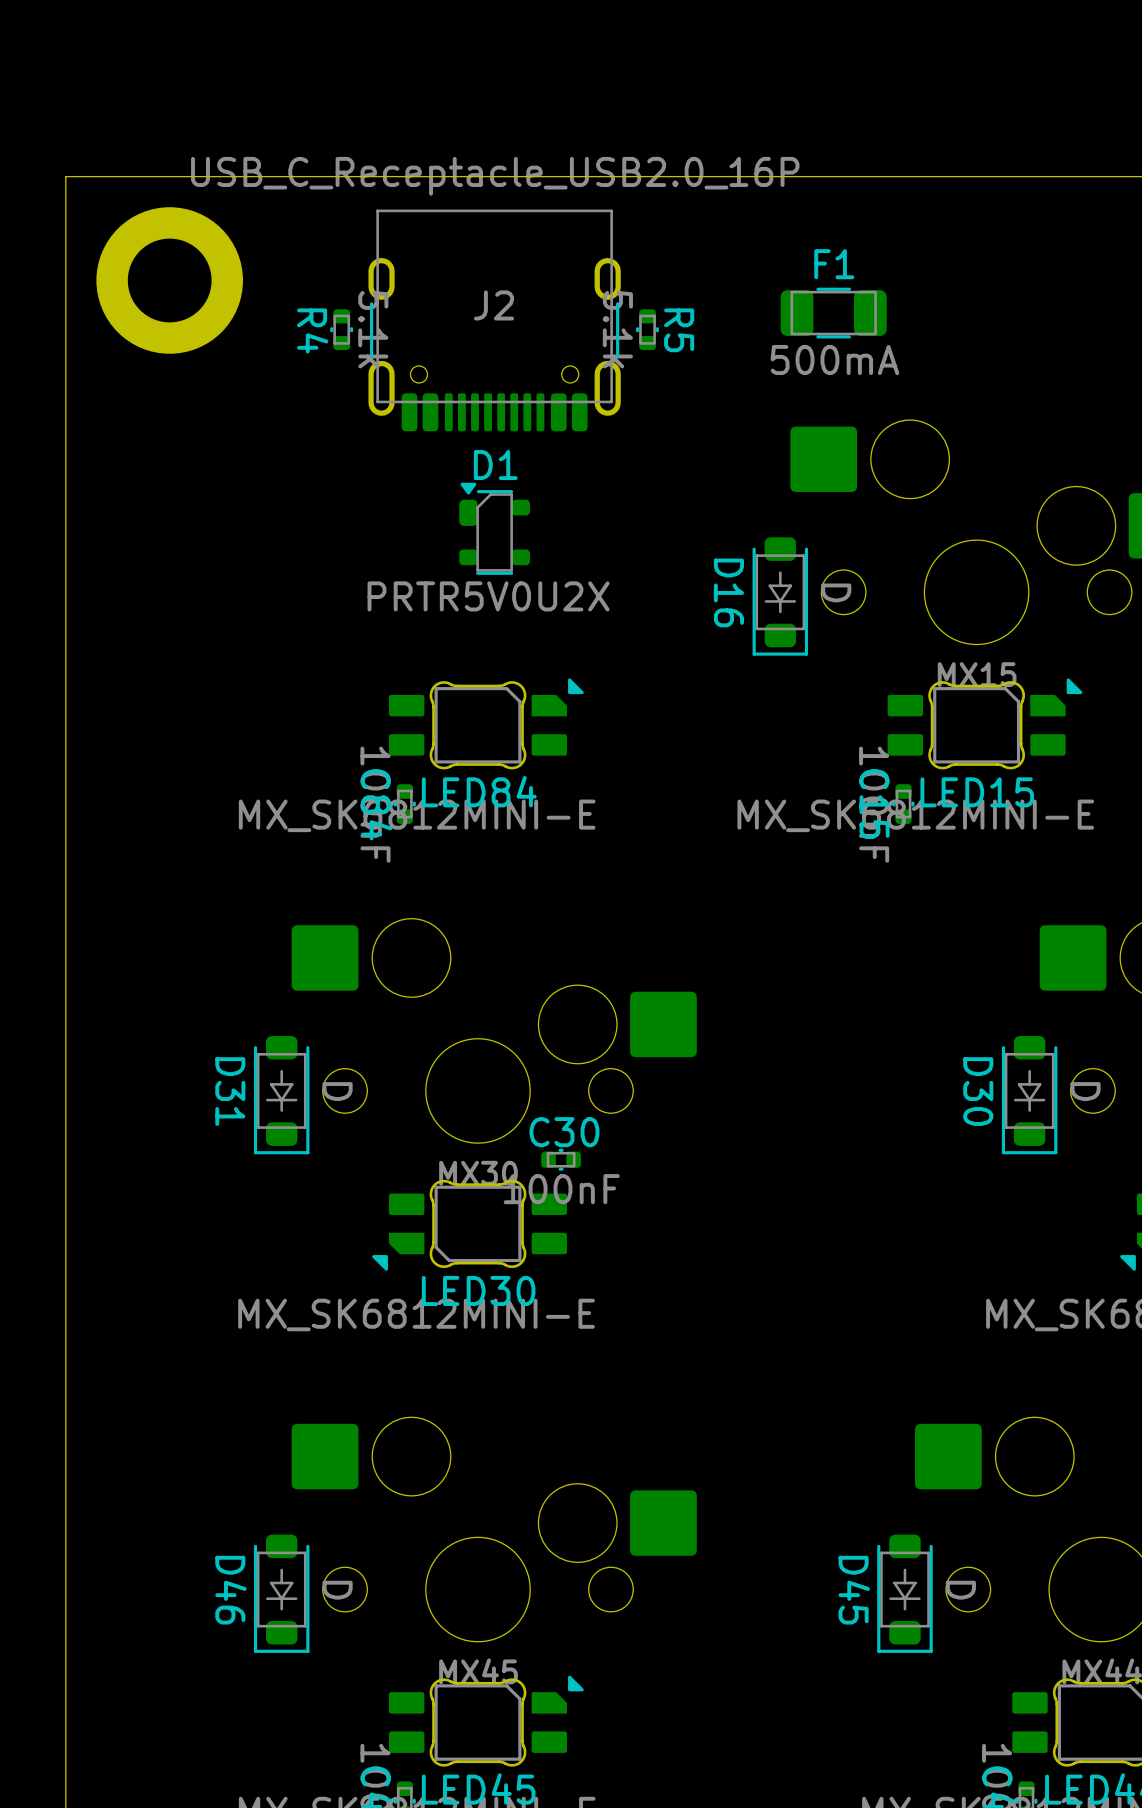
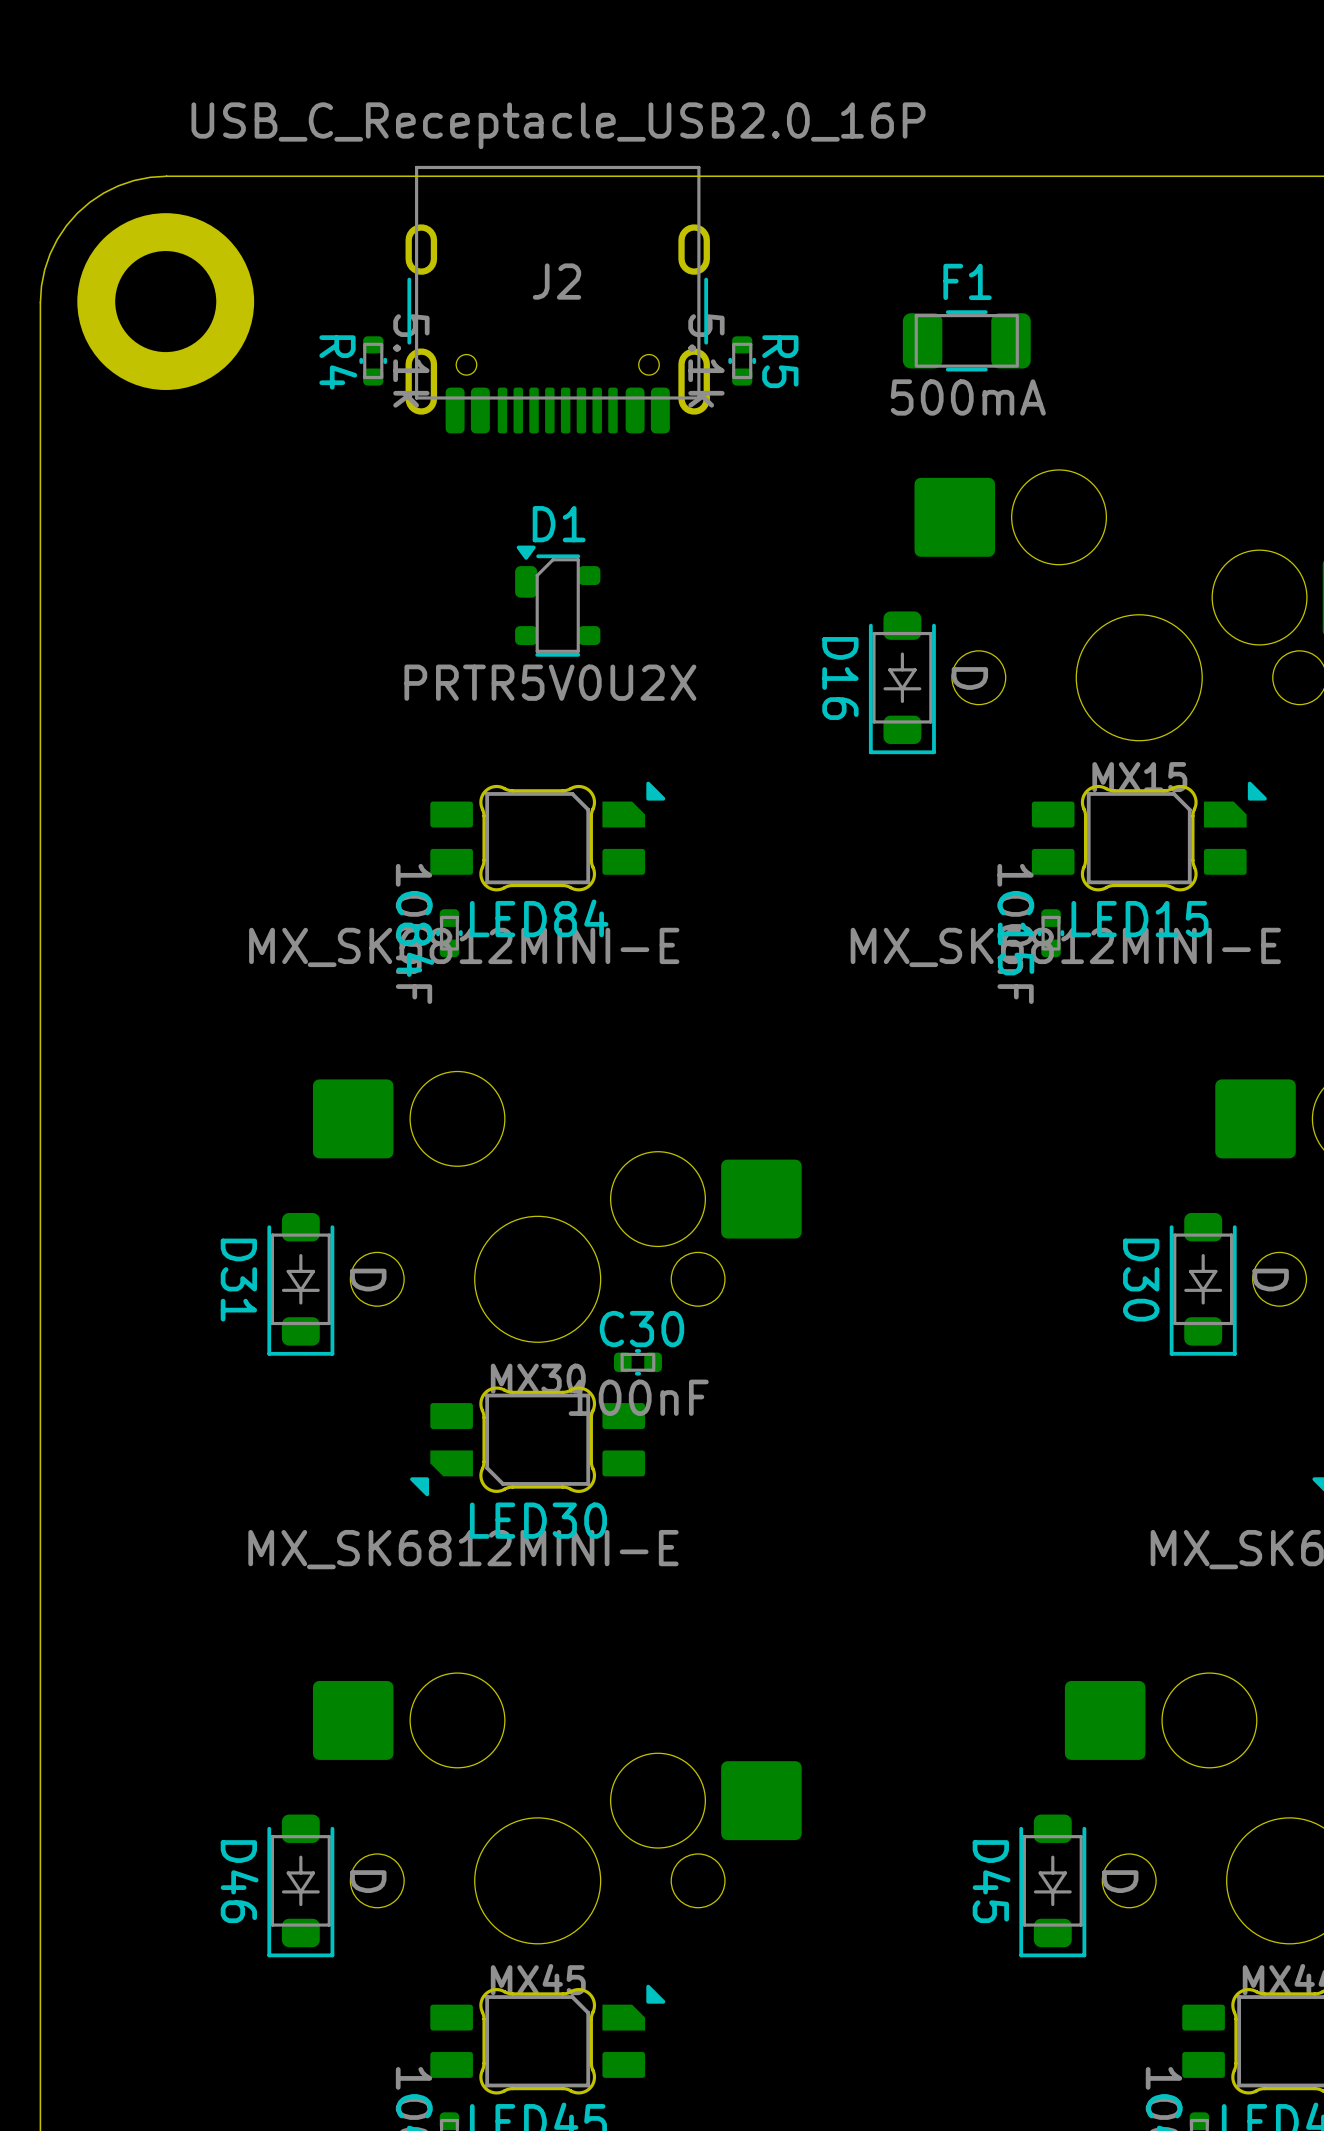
board edge: (170, 176) (65, 176) (65, 281) -> (166, 176) (150, 177) (118, 185) (103, 193) (77, 213) (57, 239) (50, 254) (44, 269) (40, 302)
J2 position: (494, 320) -> (557, 299)

